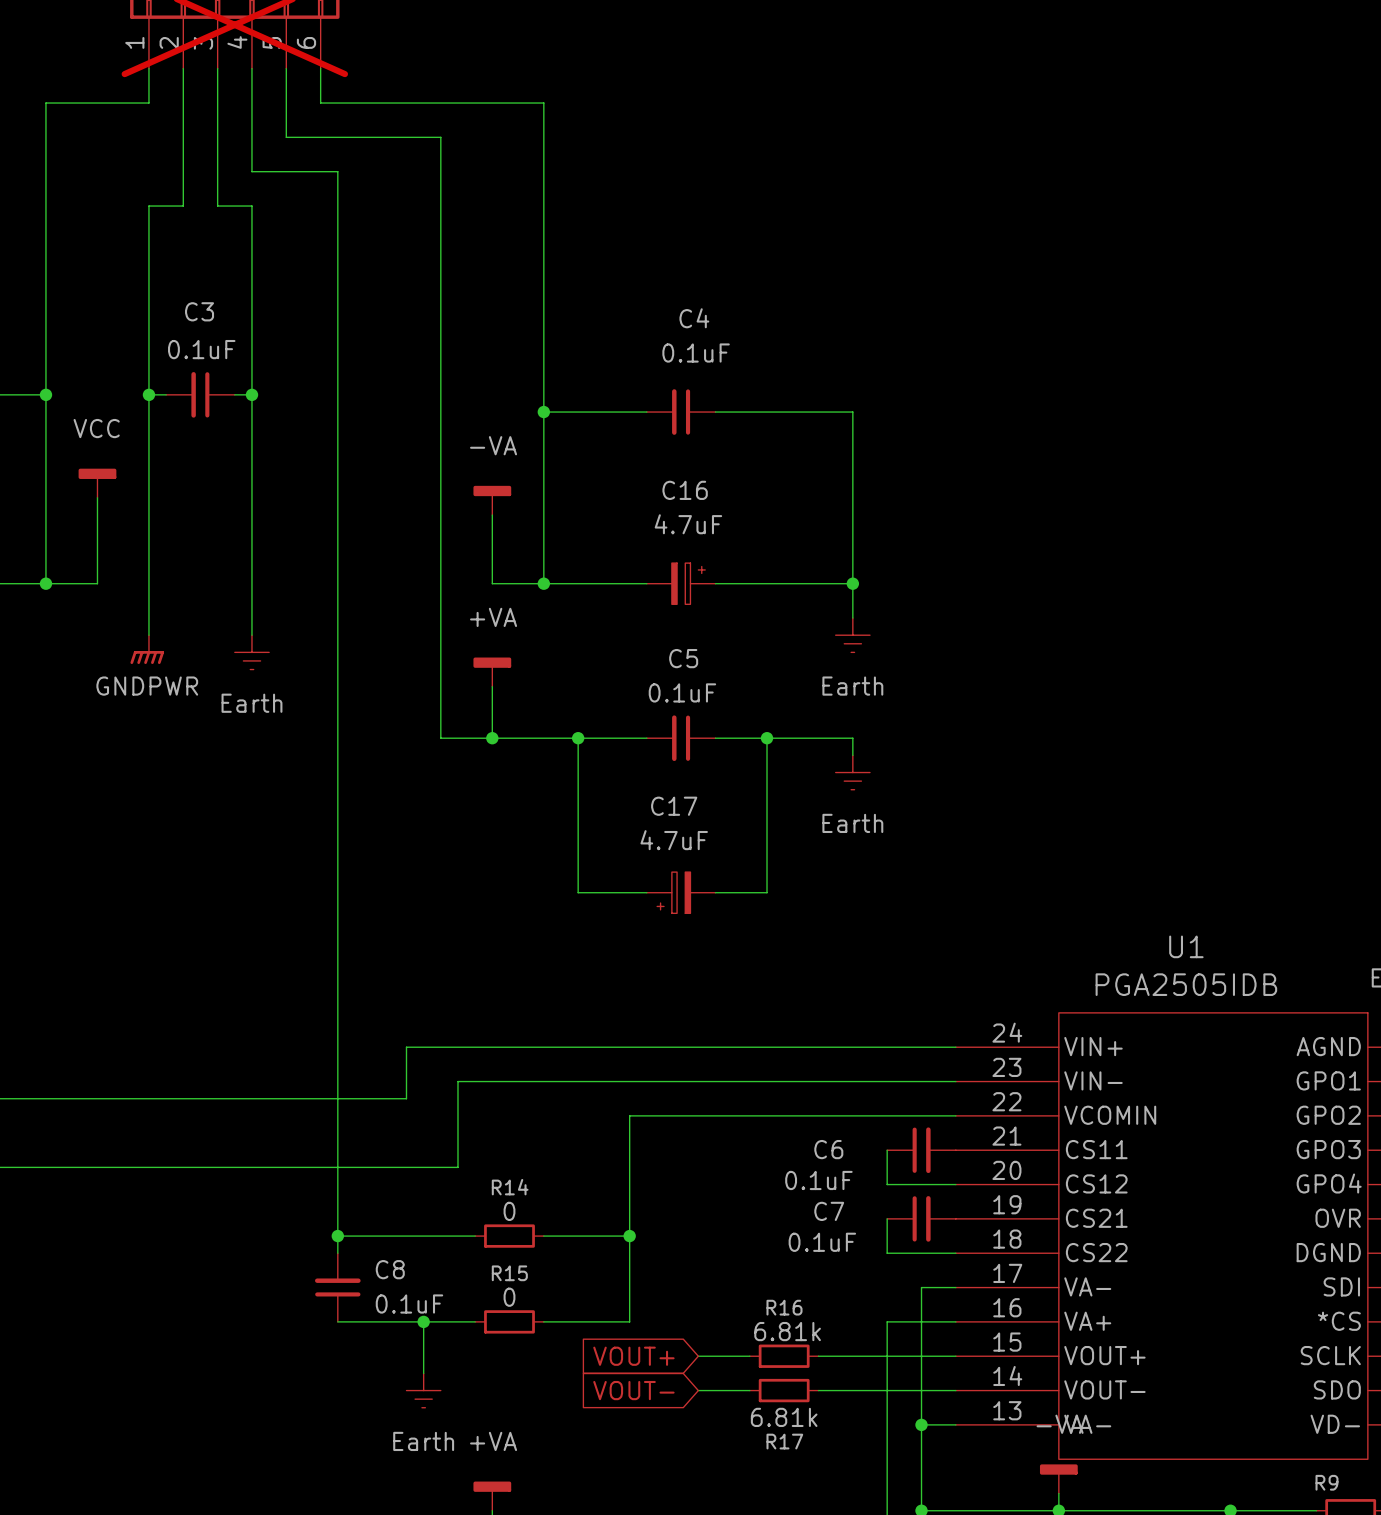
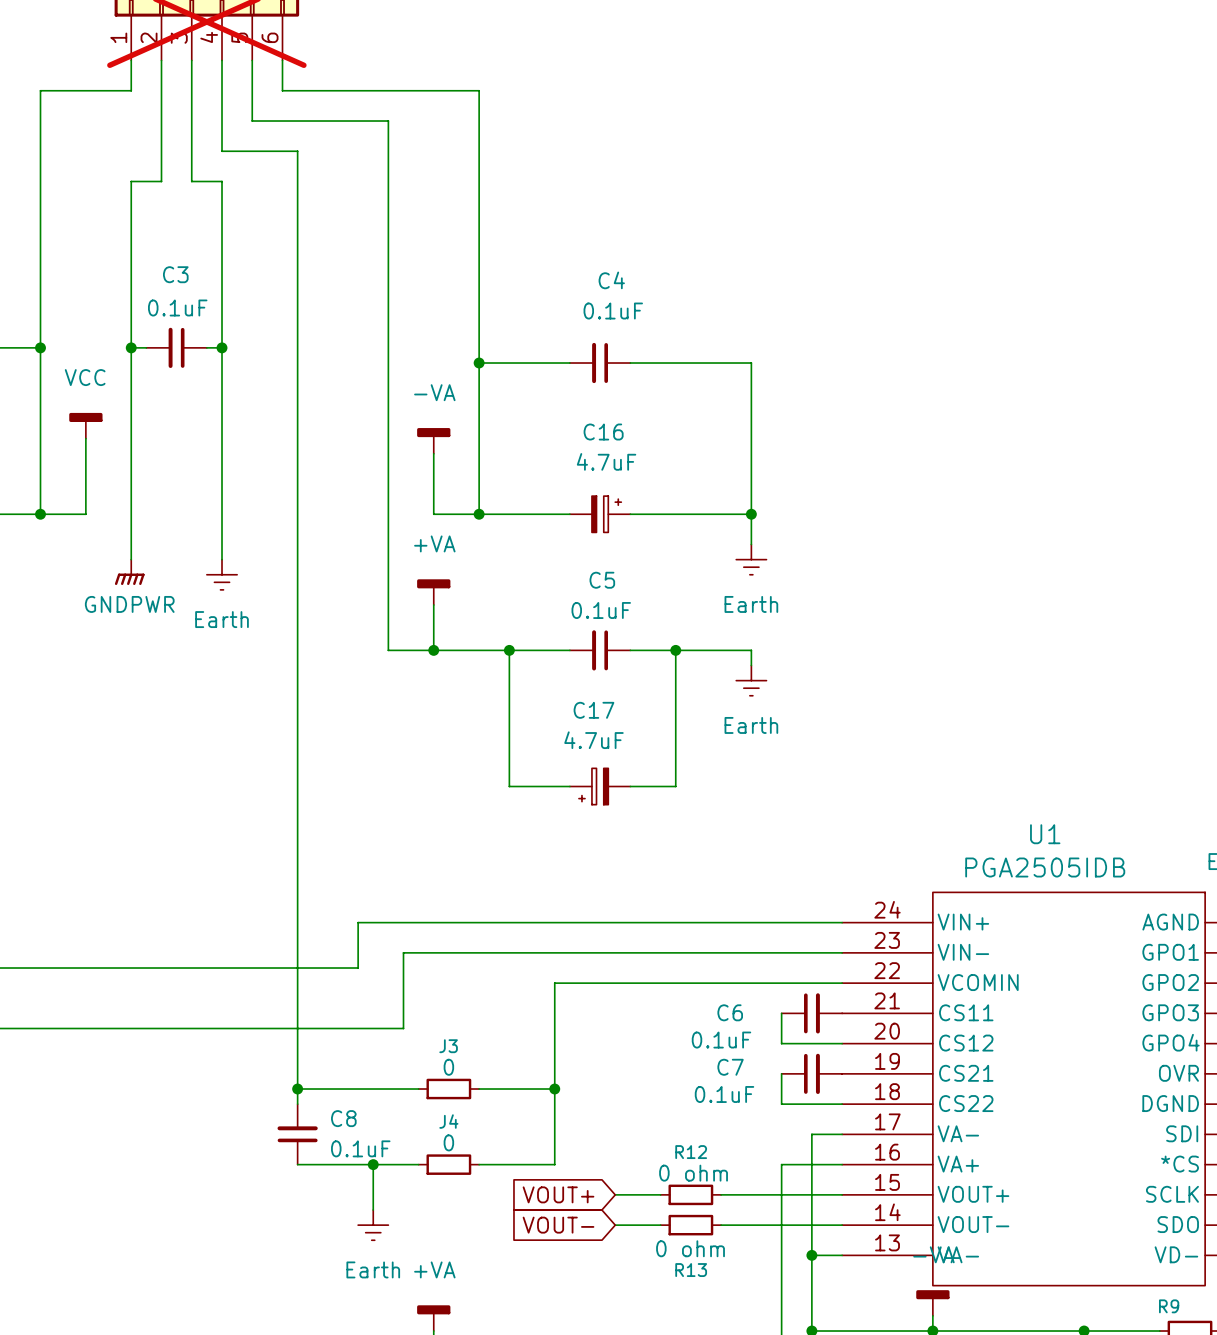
R14 name: R14 (510, 1187) -> J3 (448, 1046)
R15 name: R15 (509, 1273) -> J4 (448, 1121)
R16 name: R16 (784, 1307) -> R12 (691, 1152)
R16 value: 6.81k (787, 1331) -> 0 ohm (693, 1173)
R17 value: 6.81k (784, 1417) -> 0 ohm (690, 1248)
R17 name: R17 (784, 1441) -> R13 (691, 1270)

